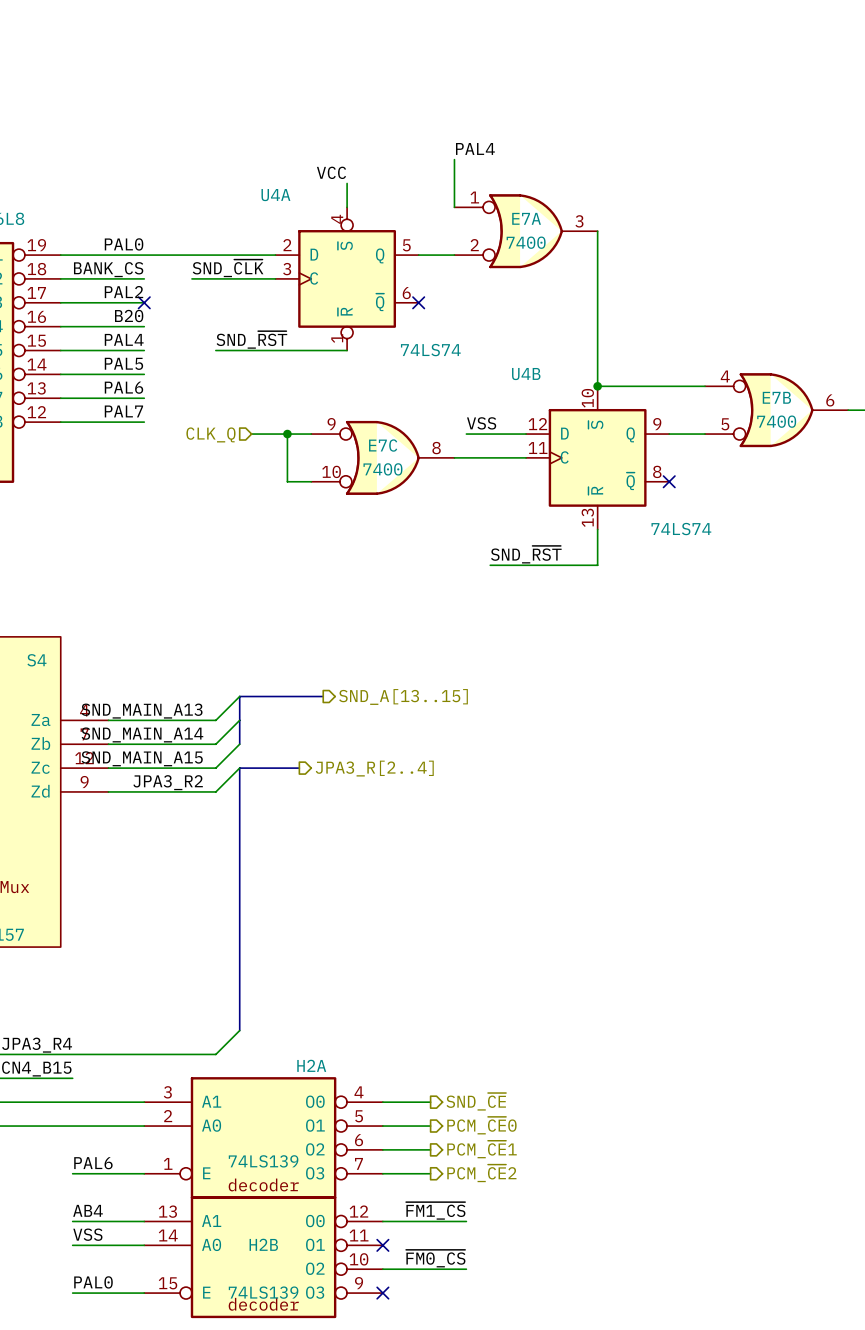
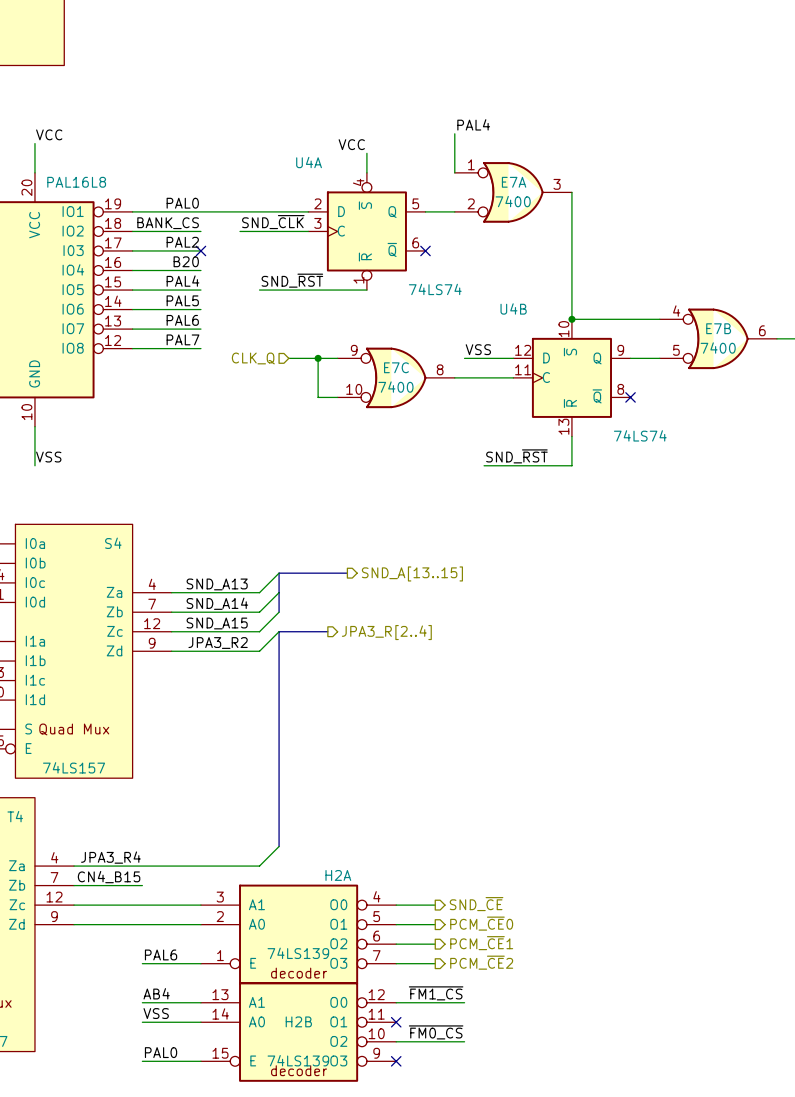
label: SND_MAIN_A13 (142, 711) -> SND_A13 (217, 584)
label: SND_MAIN_A14 (142, 734) -> SND_A14 (217, 603)
label: SND_MAIN_A15 (142, 758) -> SND_A15 (217, 623)

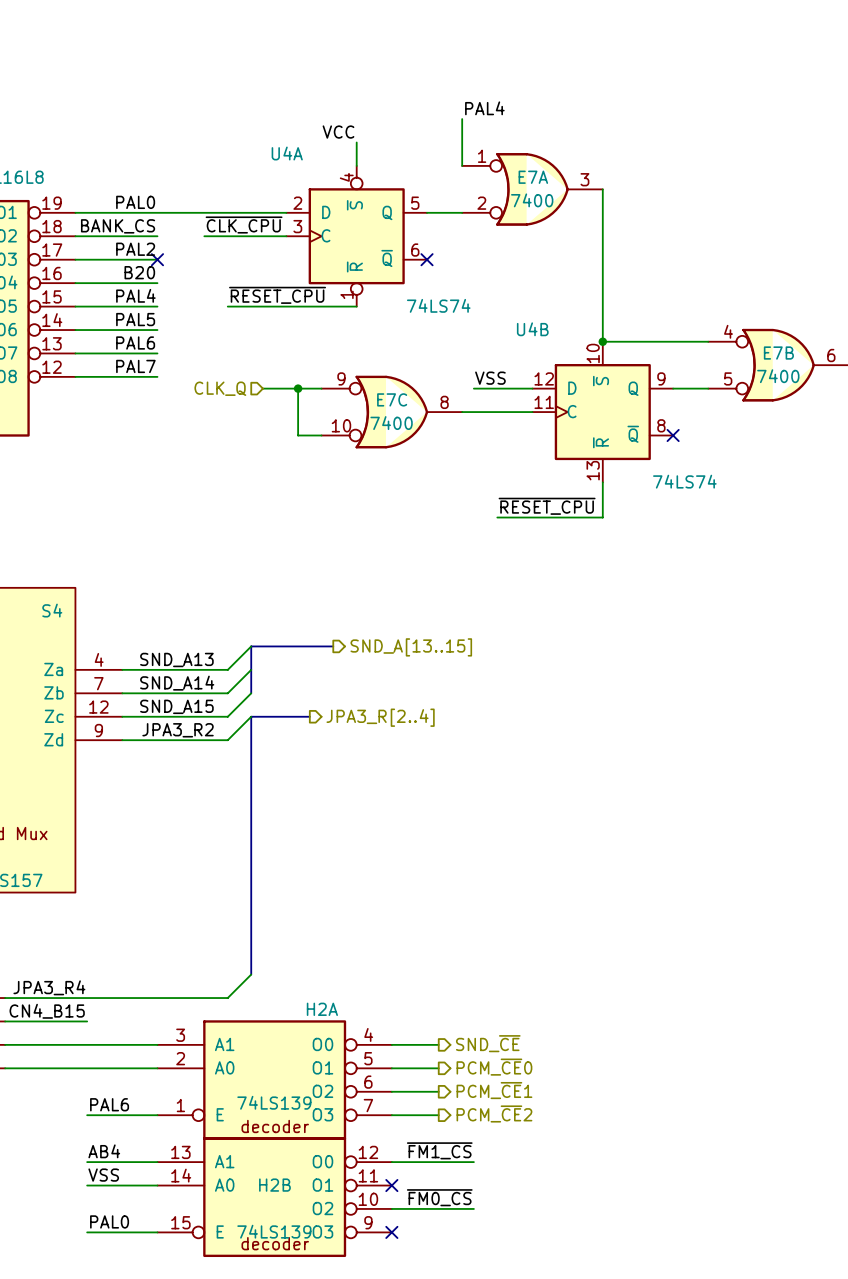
label: SND_~{CLK} (273, 222) -> ~{CLK_CPU} (244, 225)
label: SND_~{RST} (292, 280) -> ~{RESET_CPU} (277, 295)
label: SND_~{RST} (516, 456) -> ~{RESET_CPU} (547, 506)

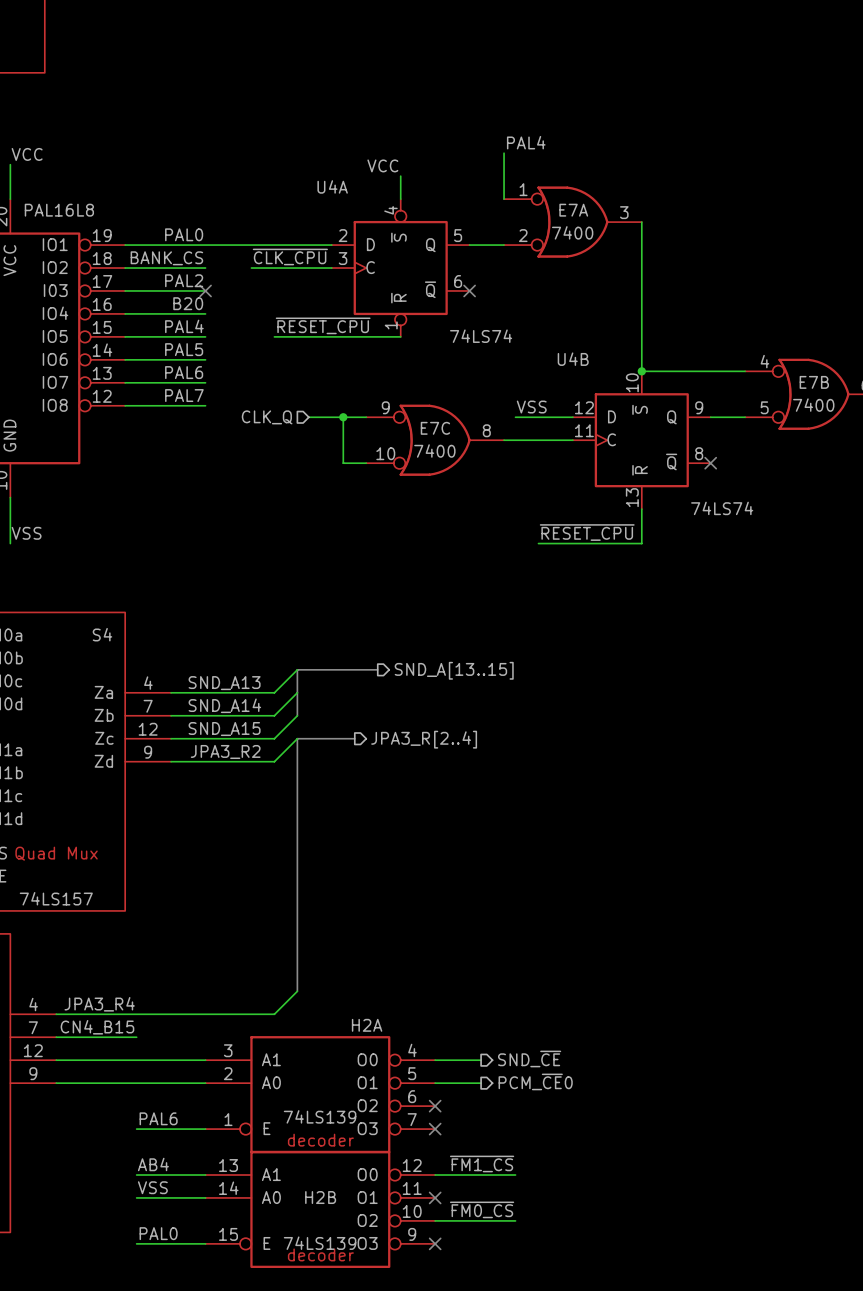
hierarchical label: PCM_~{CE}1 (494, 1090) -> none
wire: (391, 1091) (438, 1091) -> none
no-connect mark: none -> (435, 1106)
hierarchical label: PCM_~{CE}2 (494, 1113) -> none
wire: (391, 1115) (438, 1115) -> none
no-connect mark: none -> (435, 1129)

